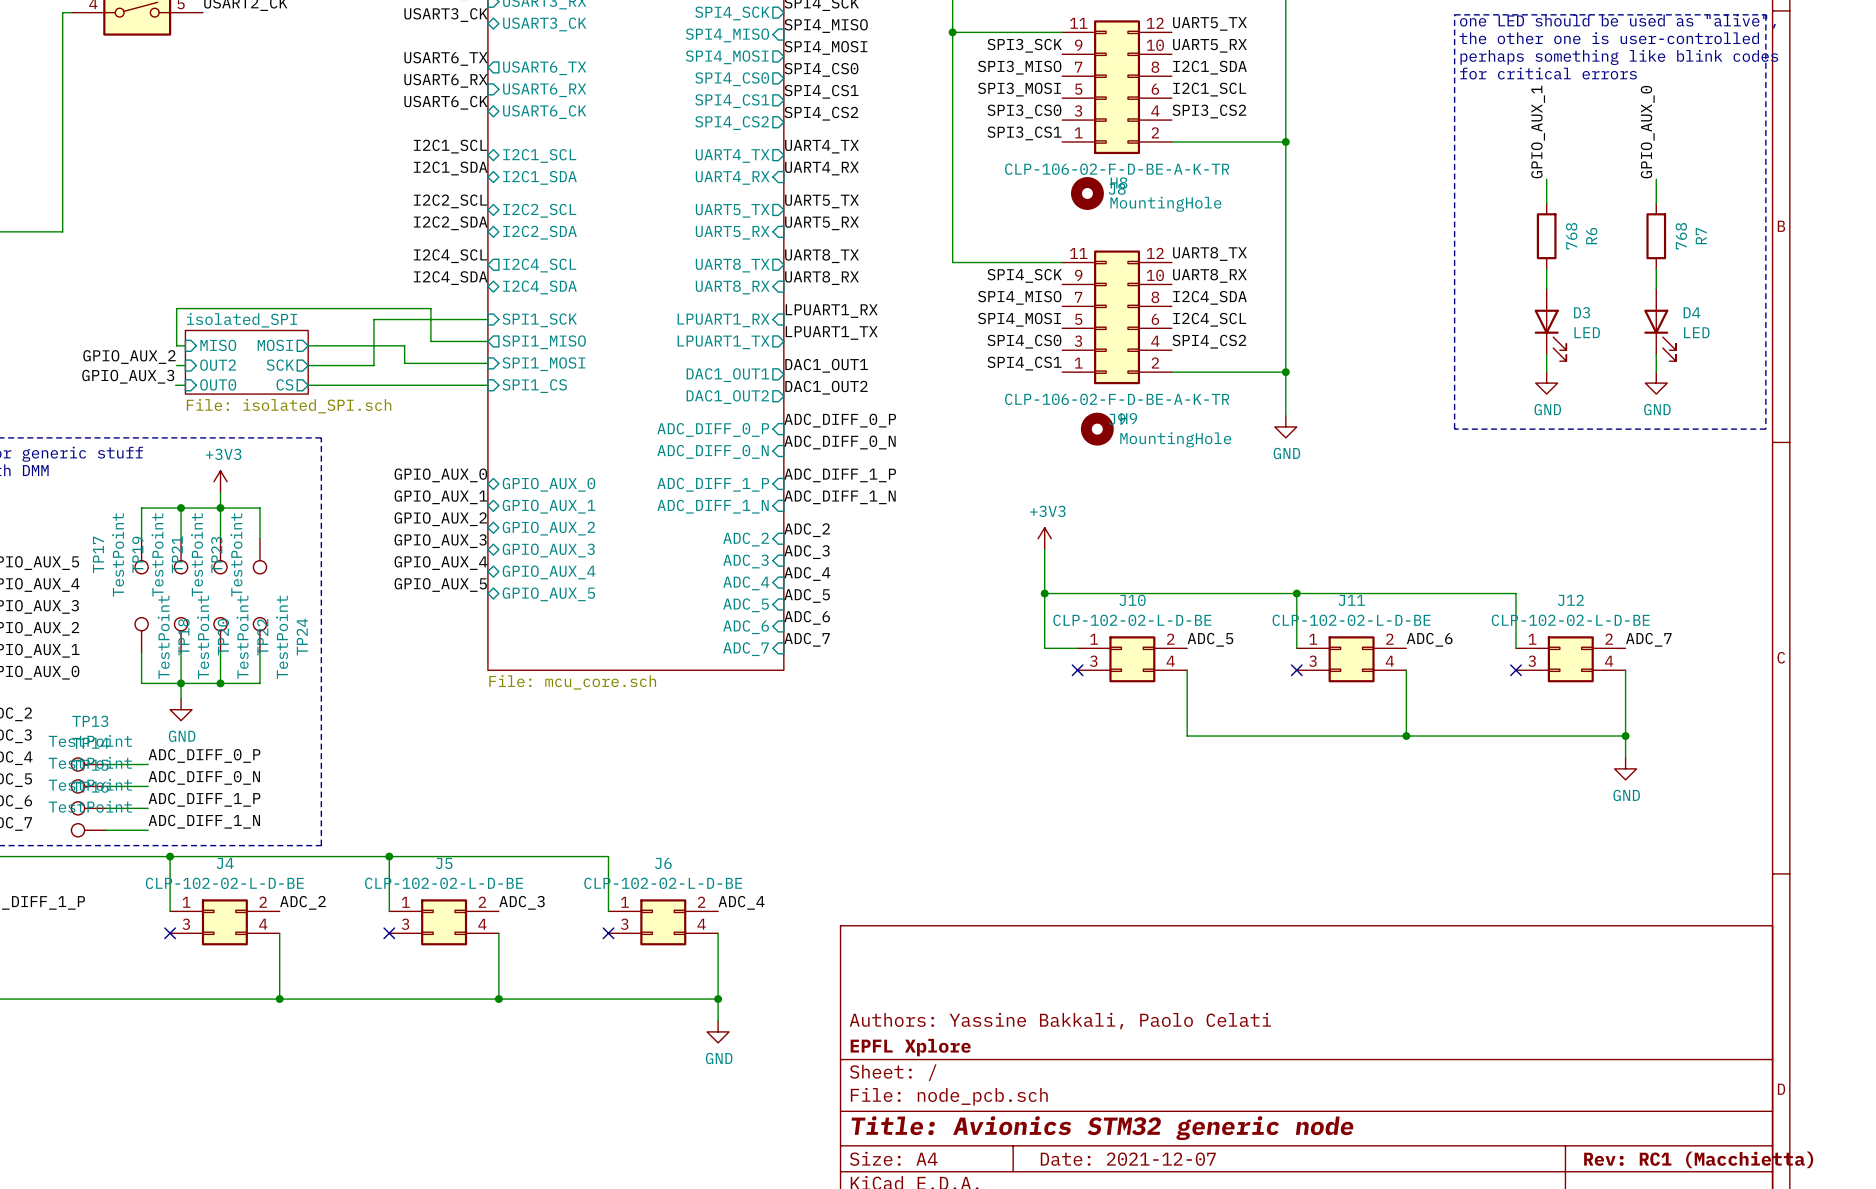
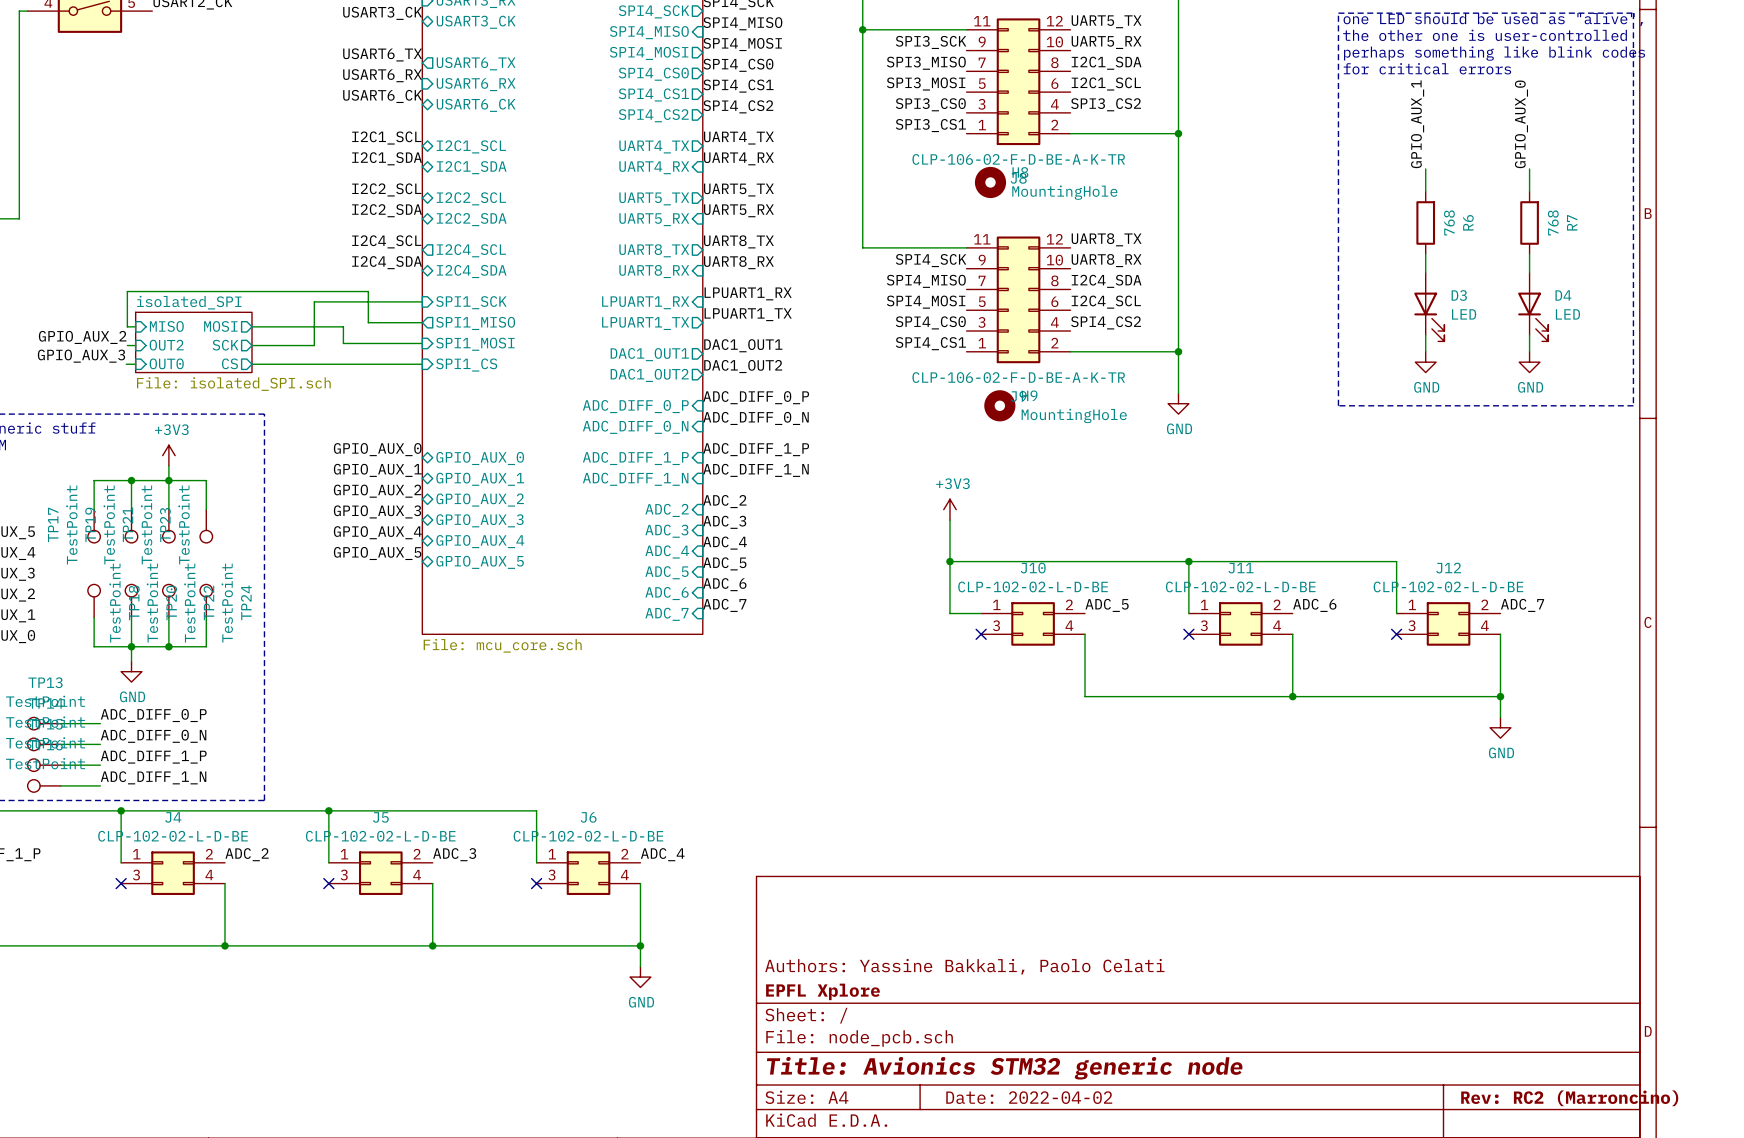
title block: Date: 2021-12-07 (1128, 1159) -> Date: 2022-04-02 (1029, 1097)
title block: Rev: RC1 (Macchietta) (1698, 1159) -> Rev: RC2 (Marroncino) (1569, 1098)

